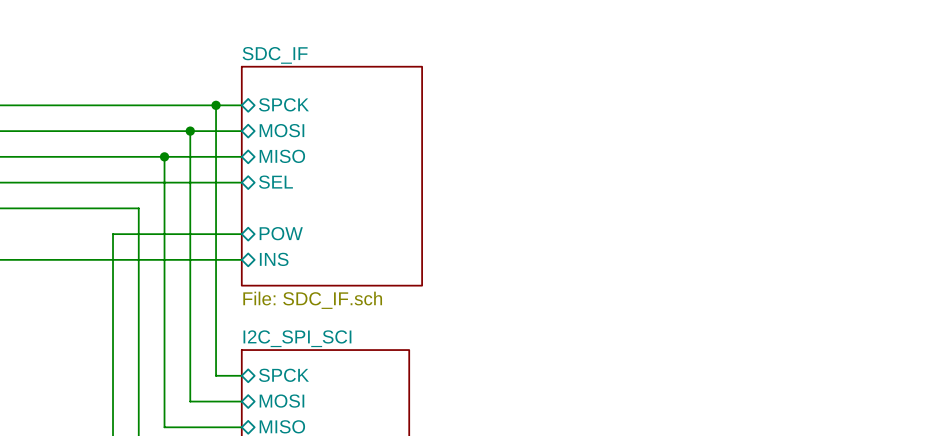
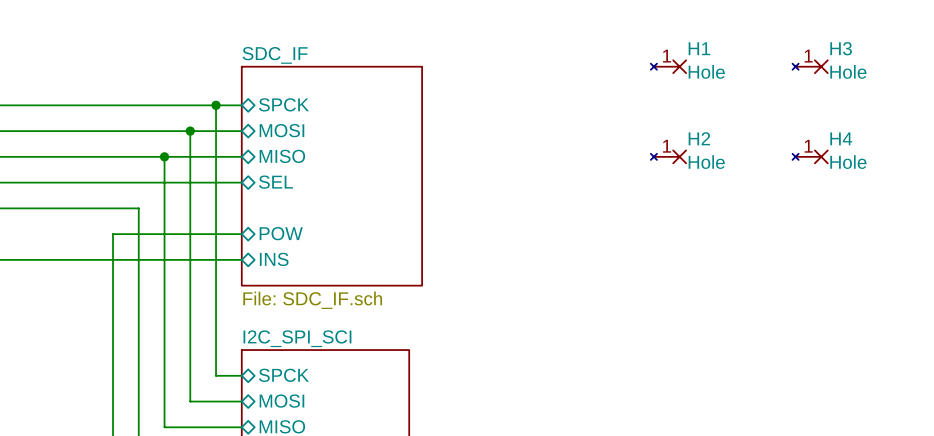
H1: none -> Hole (668, 66)
H3: none -> Hole (810, 66)
H2: none -> Hole (668, 156)
H4: none -> Hole (810, 156)

